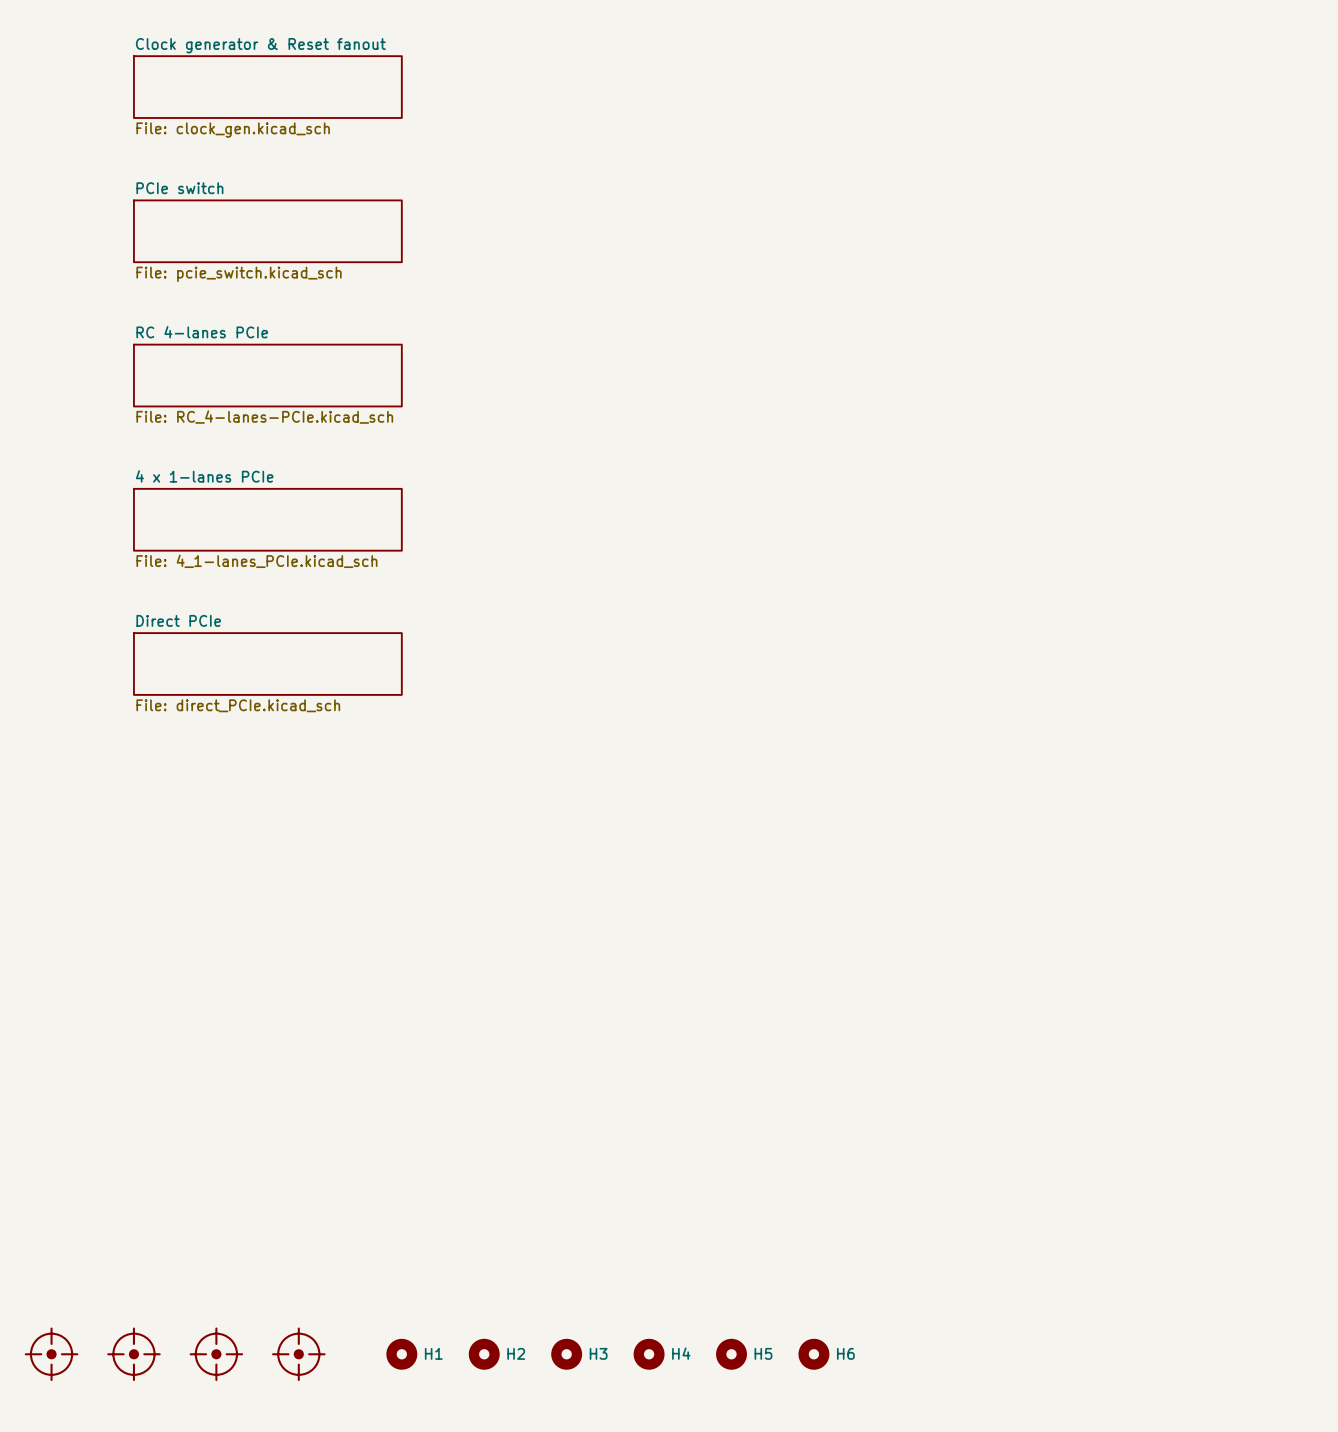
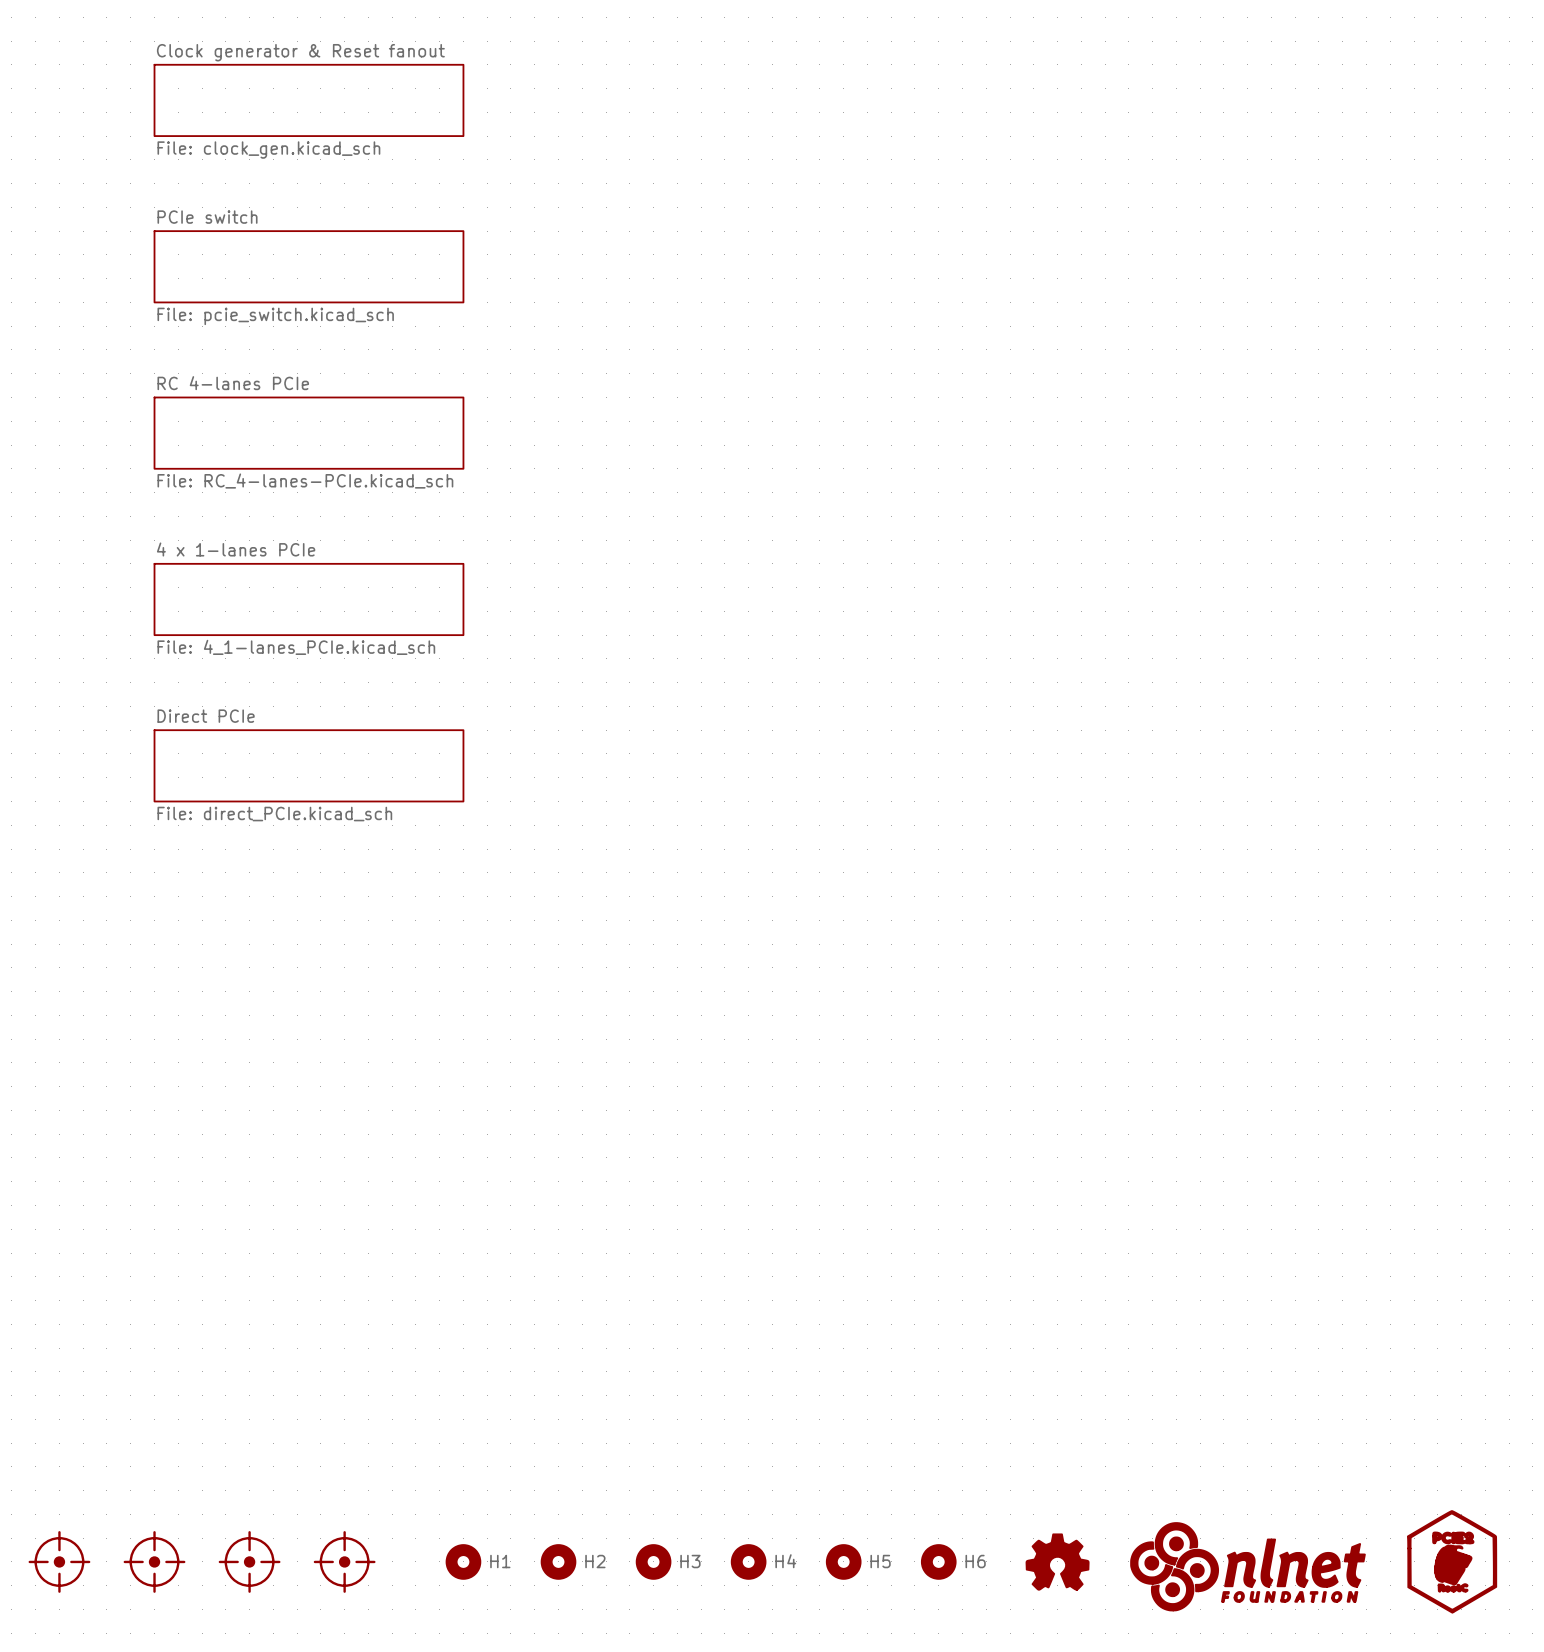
part: none -> (1057, 1562)
part: none -> (1452, 1561)
part: none -> (1247, 1566)

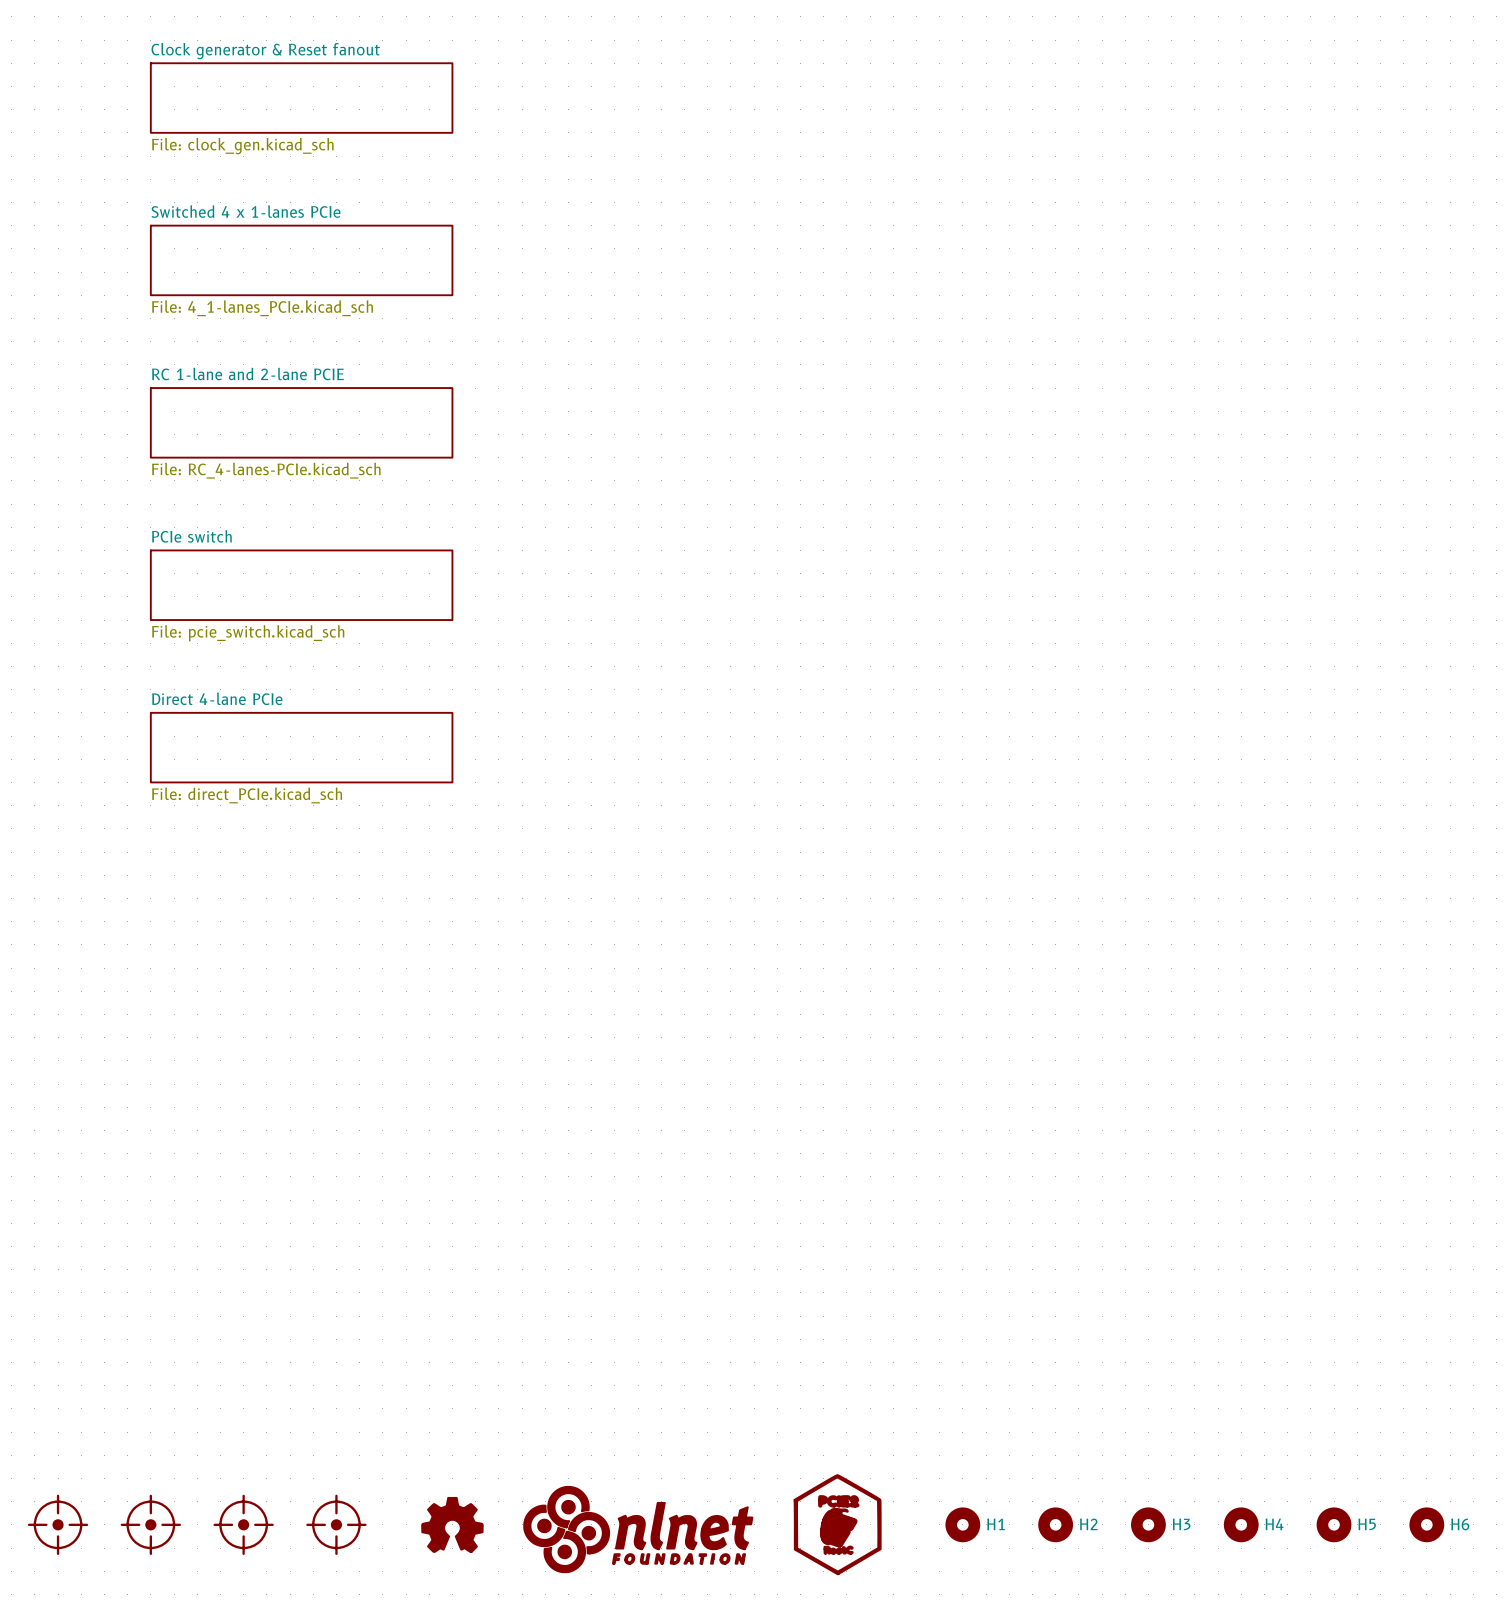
sheet PCIe switch name: PCIe switch (207, 217) -> Switched 4 x 1-lanes PCIe (245, 211)
sheet PCIe switch value: File: pcie_switch.kicad_sch (275, 316) -> File: 4_1-lanes_PCIe.kicad_sch (262, 308)
sheet RC 4-lanes PCIe name: RC 4-lanes PCIe (233, 383) -> RC 1-lane and 2-lane PCIE (247, 374)
sheet 4 x 1-lanes PCIe name: 4 x 1-lanes PCIe (236, 549) -> PCIe switch (191, 536)
sheet 4 x 1-lanes PCIe value: File: 4_1-lanes_PCIe.kicad_sch (296, 647) -> File: pcie_switch.kicad_sch (248, 633)
sheet Direct PCIe name: Direct PCIe (206, 716) -> Direct 4-lane PCIe (217, 698)
H1 position: (463, 1561) -> (962, 1524)
H2 position: (558, 1561) -> (1055, 1524)
H3 position: (653, 1561) -> (1148, 1524)
H4 position: (748, 1561) -> (1241, 1524)
H5 position: (843, 1561) -> (1334, 1524)
part: none -> (837, 1524)
H6 position: (938, 1561) -> (1426, 1524)
part: (1452, 1561) -> none
part: none -> (452, 1524)
part: (1057, 1562) -> none
part: none -> (638, 1529)
part: (1247, 1566) -> none

